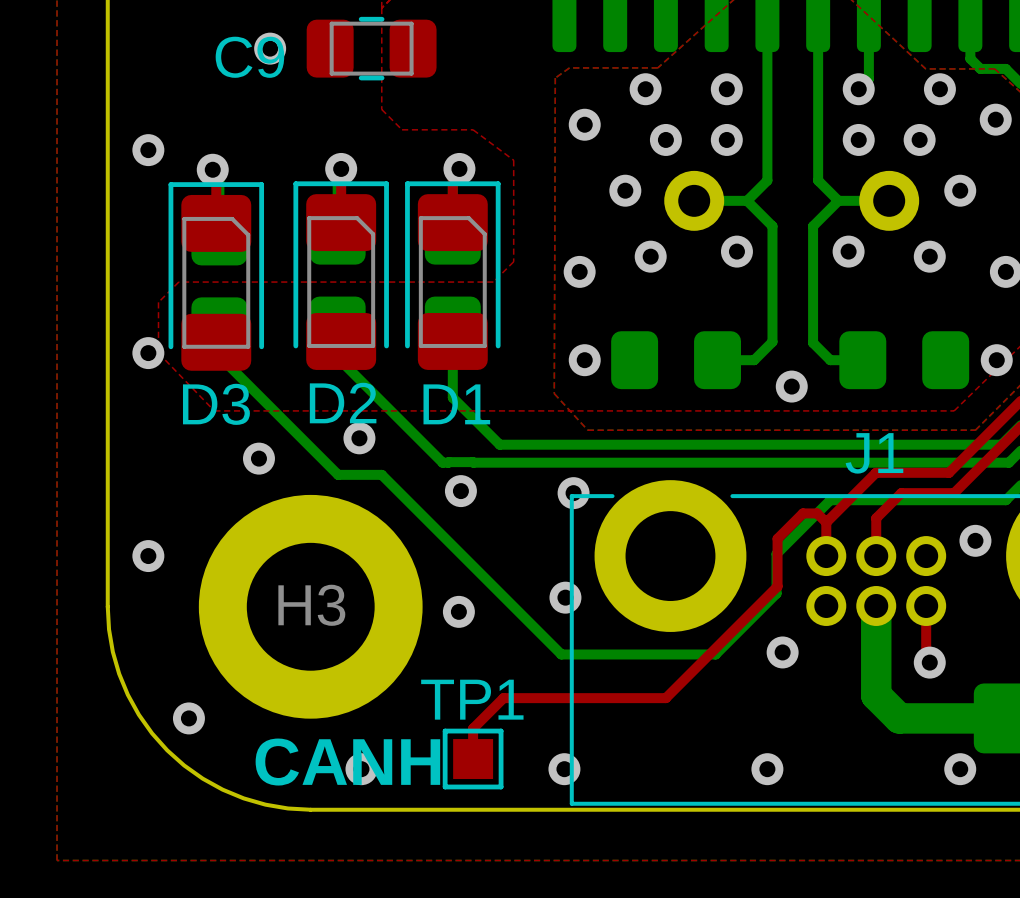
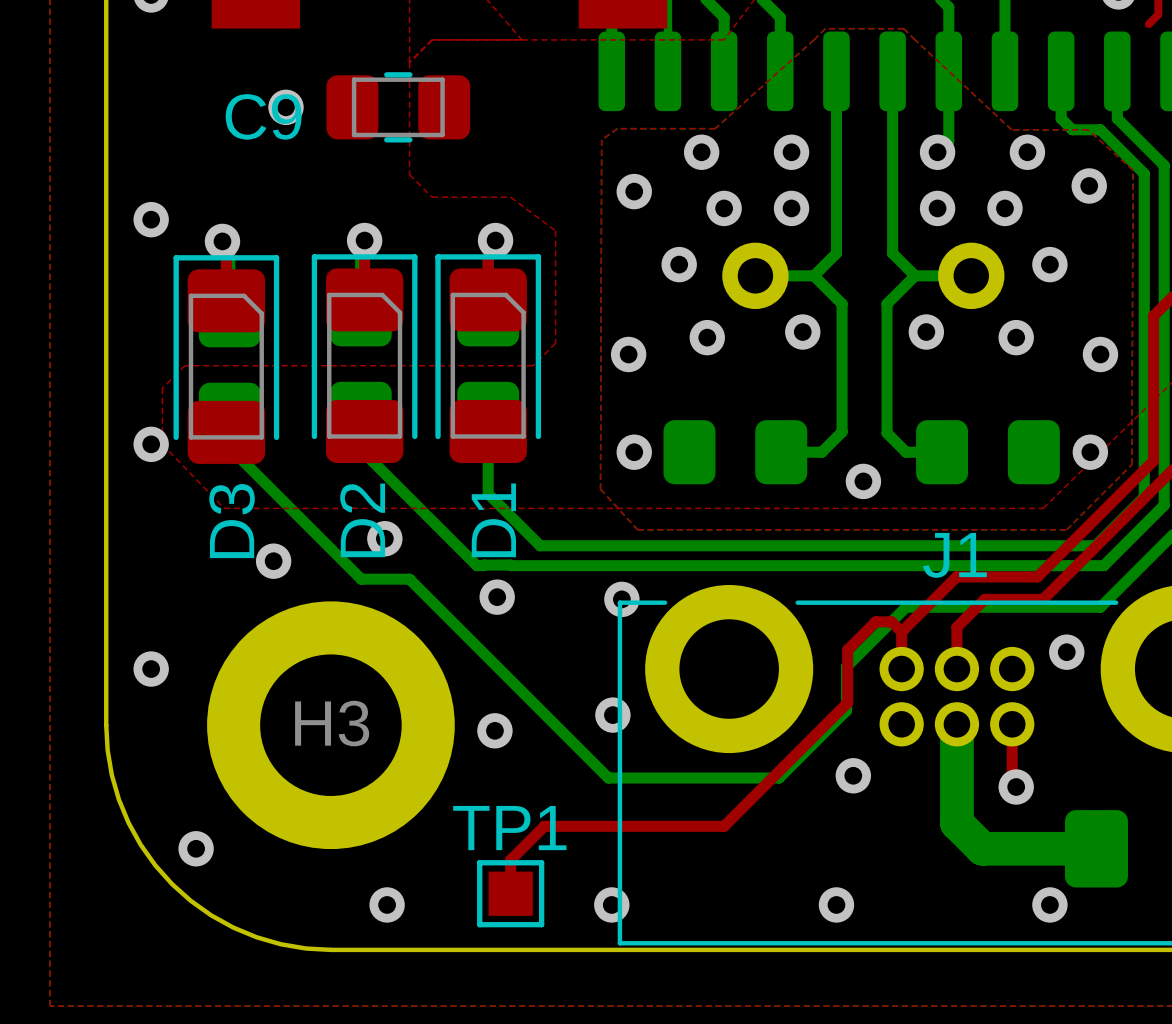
D2 name rotation: 0° (343, 403) -> 90° counterclockwise (362, 520)
D3 name rotation: 0° (216, 404) -> 90° counterclockwise (232, 521)
D1 name rotation: 0° (456, 404) -> 90° counterclockwise (493, 520)
text: CANH (347, 762) -> none

